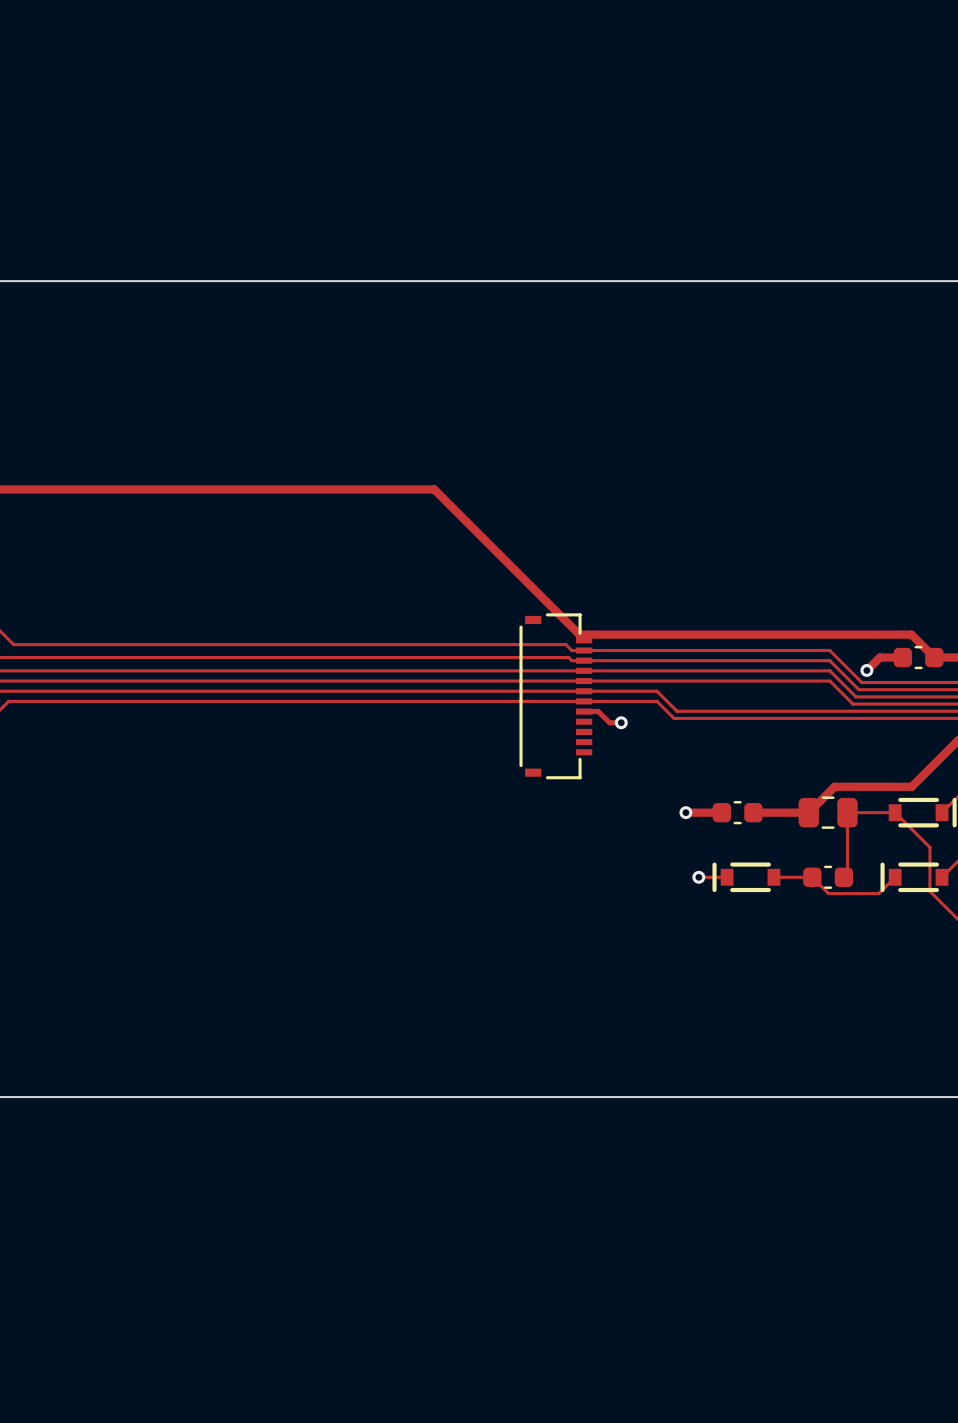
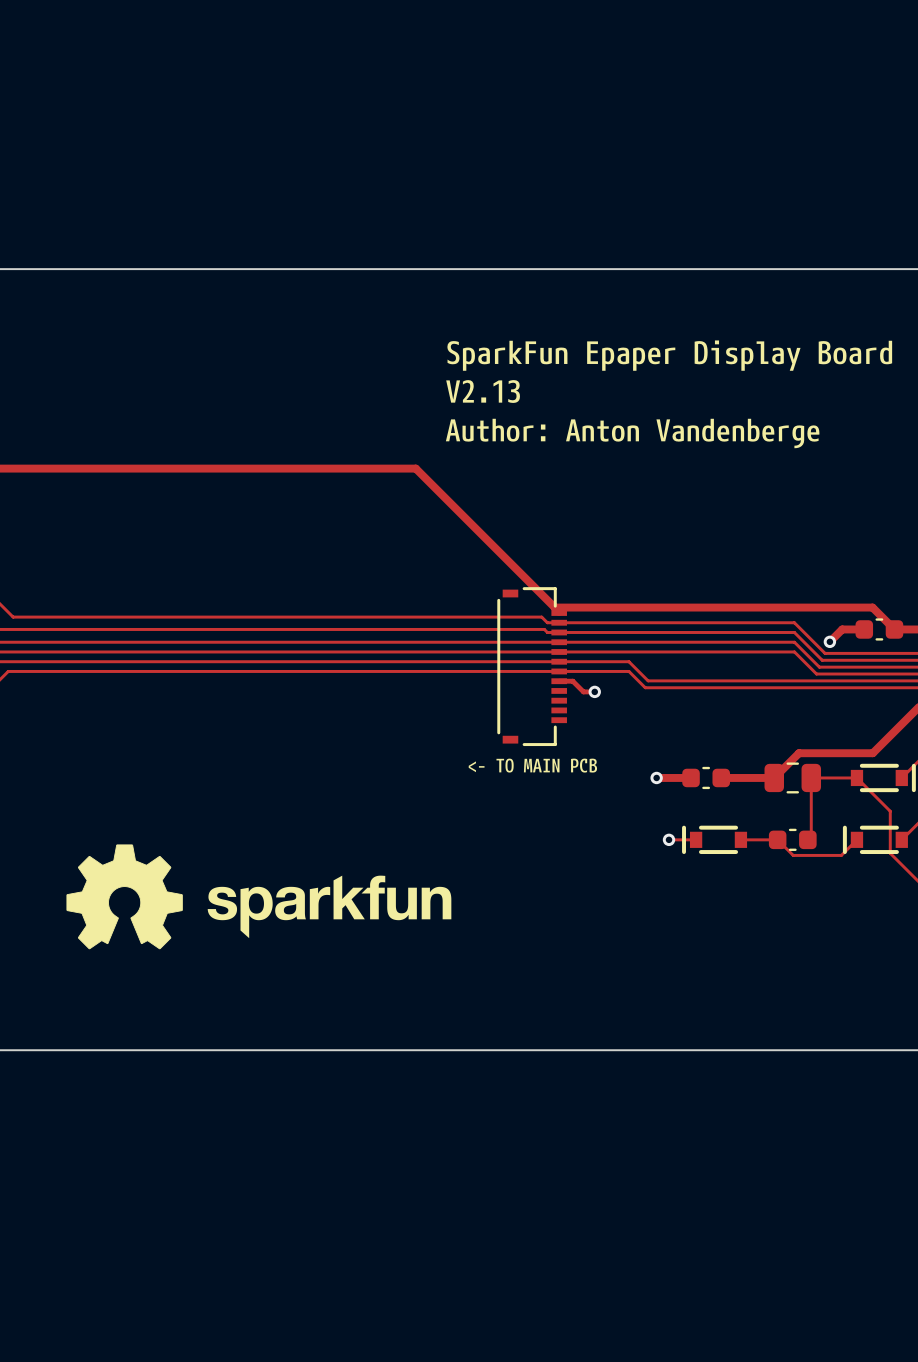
drawing: none -> [445, 340, 893, 449]
drawing: none -> [468, 758, 598, 773]
drawing: none -> [66, 844, 183, 950]
drawing: none -> [207, 875, 452, 939]

